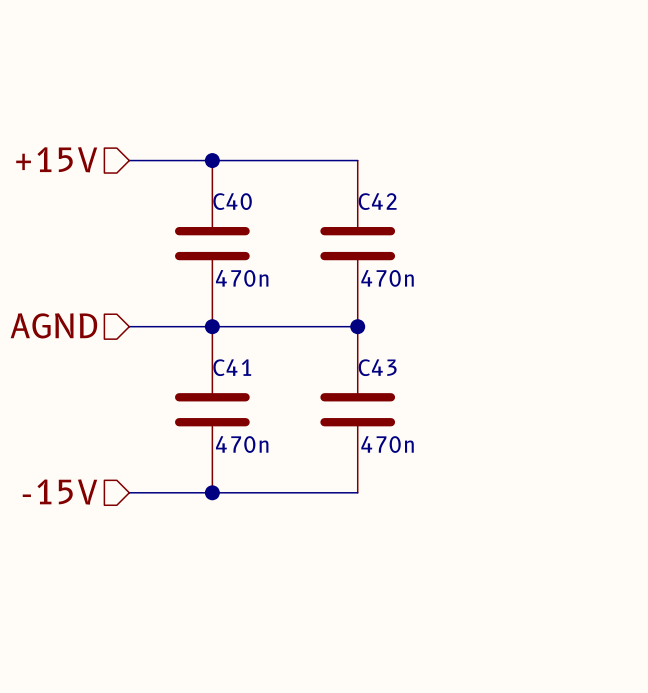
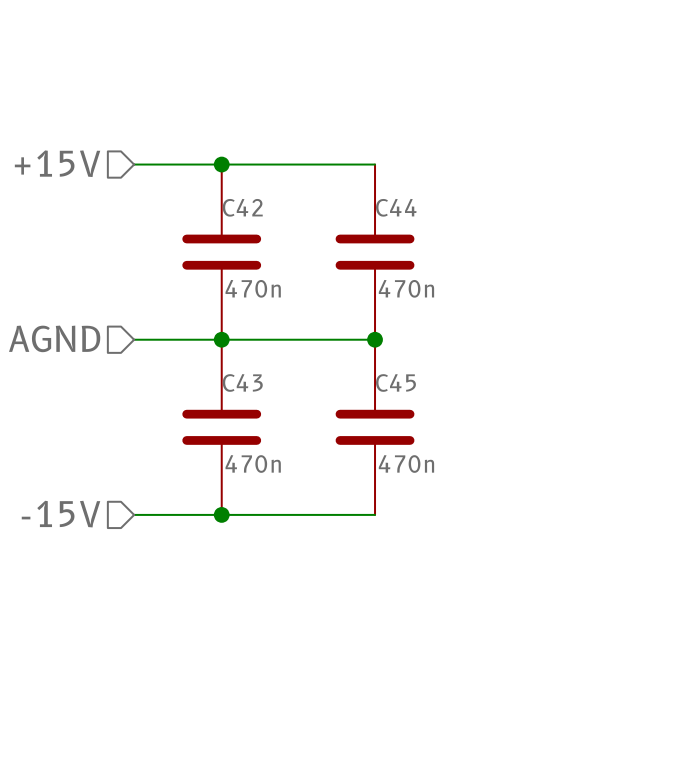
C40 name: C40 (232, 201) -> C42 (242, 207)
C42 name: C42 (377, 201) -> C44 (396, 207)
C41 name: C41 (232, 367) -> C43 (242, 382)
C43 name: C43 (377, 367) -> C45 (395, 382)

